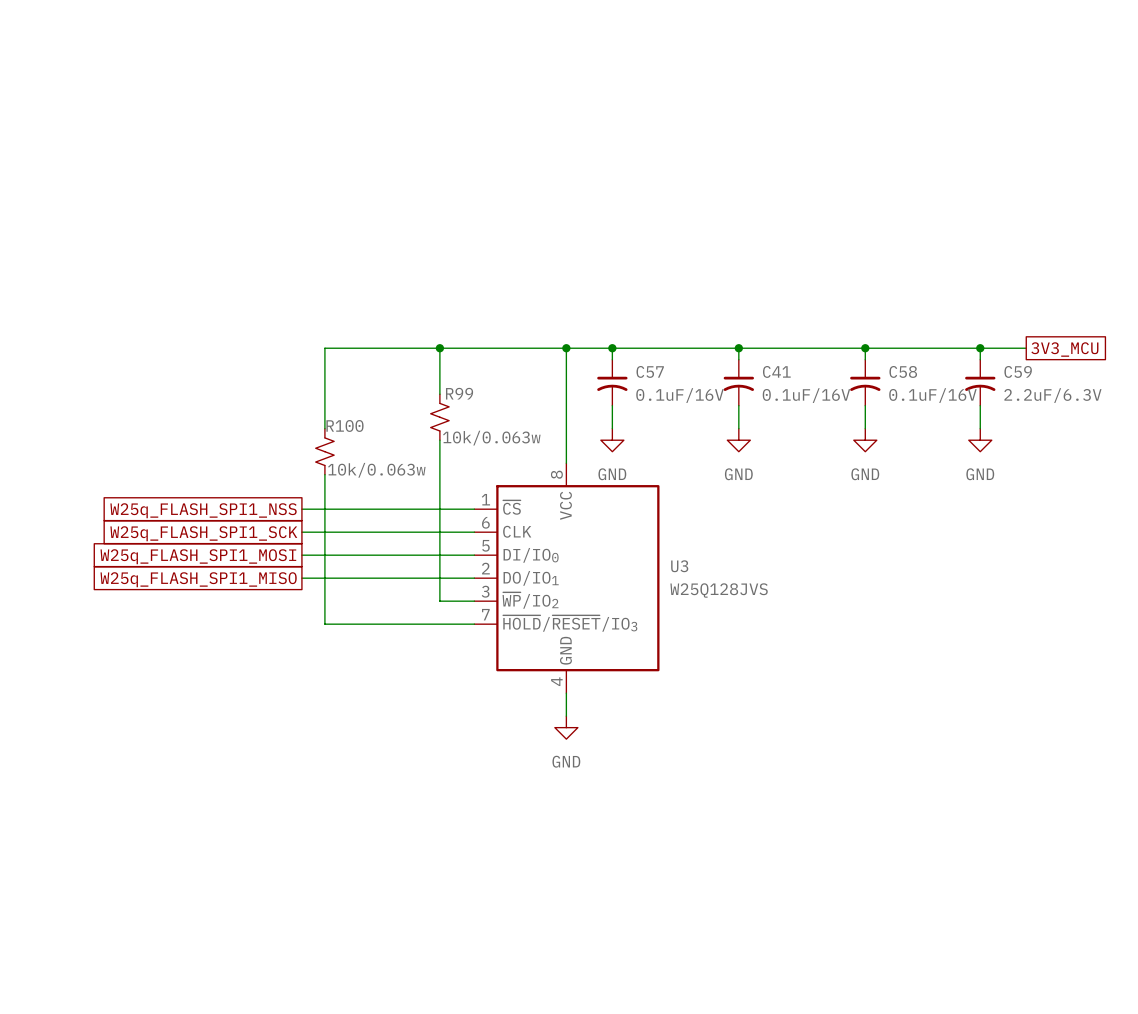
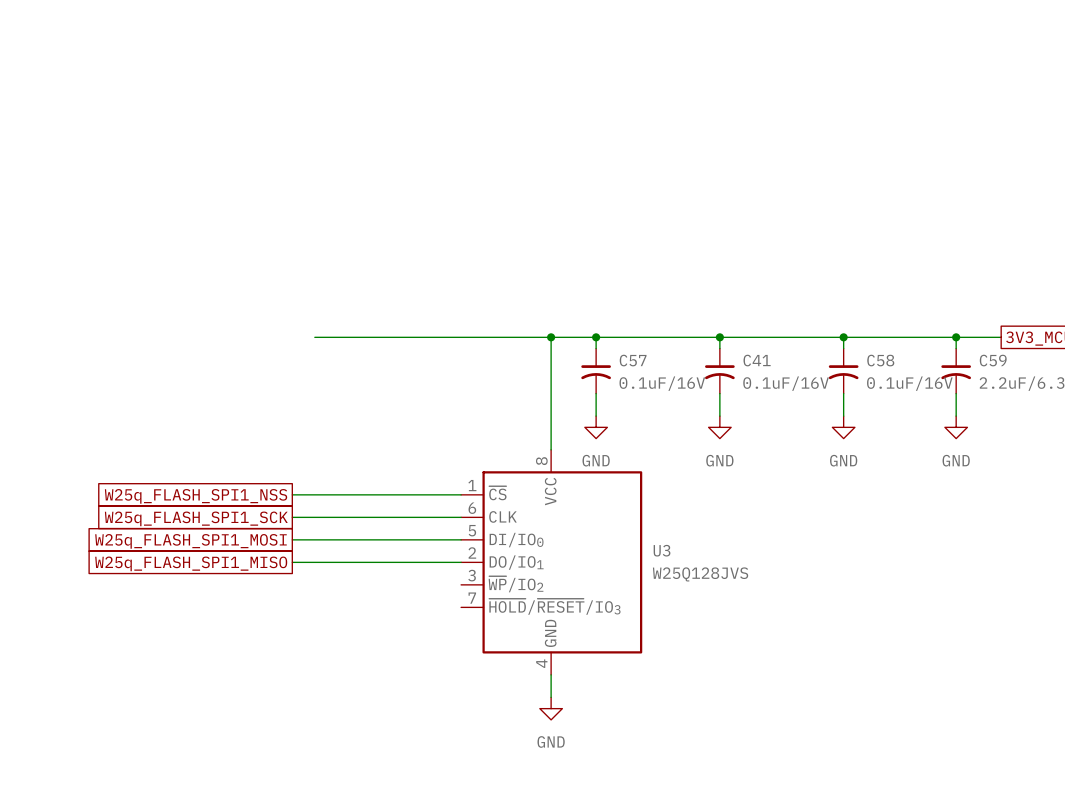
wire: (324, 348) (324, 428) -> none
wire: (439, 348) (439, 394) -> none
junction: (439, 348) -> none
R99: 10k/0.063w (439, 417) -> none
wire: (439, 440) (439, 601) (474, 601) -> none
R100: 10k/0.063w (324, 451) -> none
wire: (324, 474) (324, 624) (474, 624) -> none

